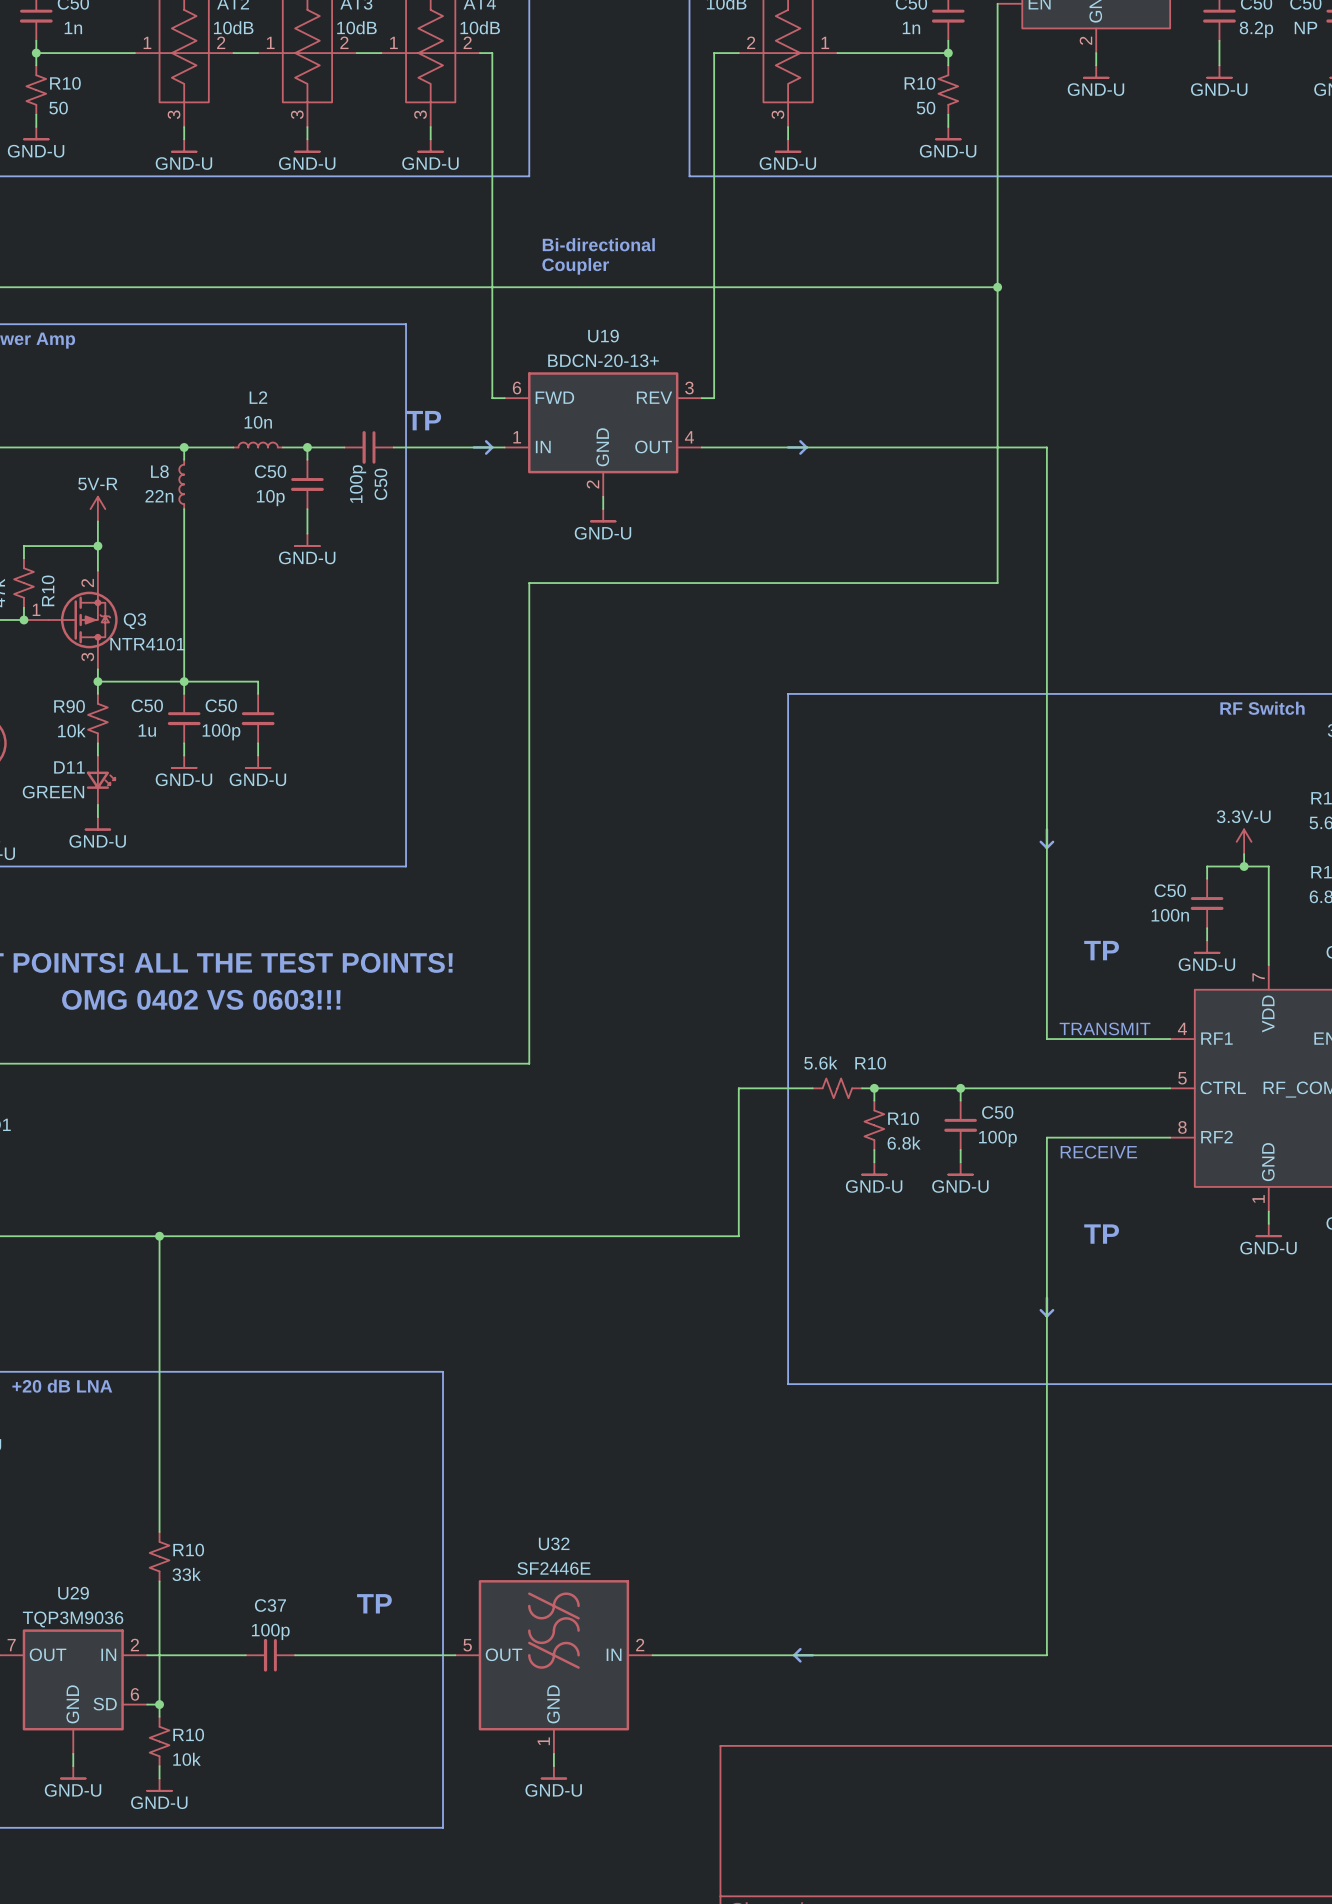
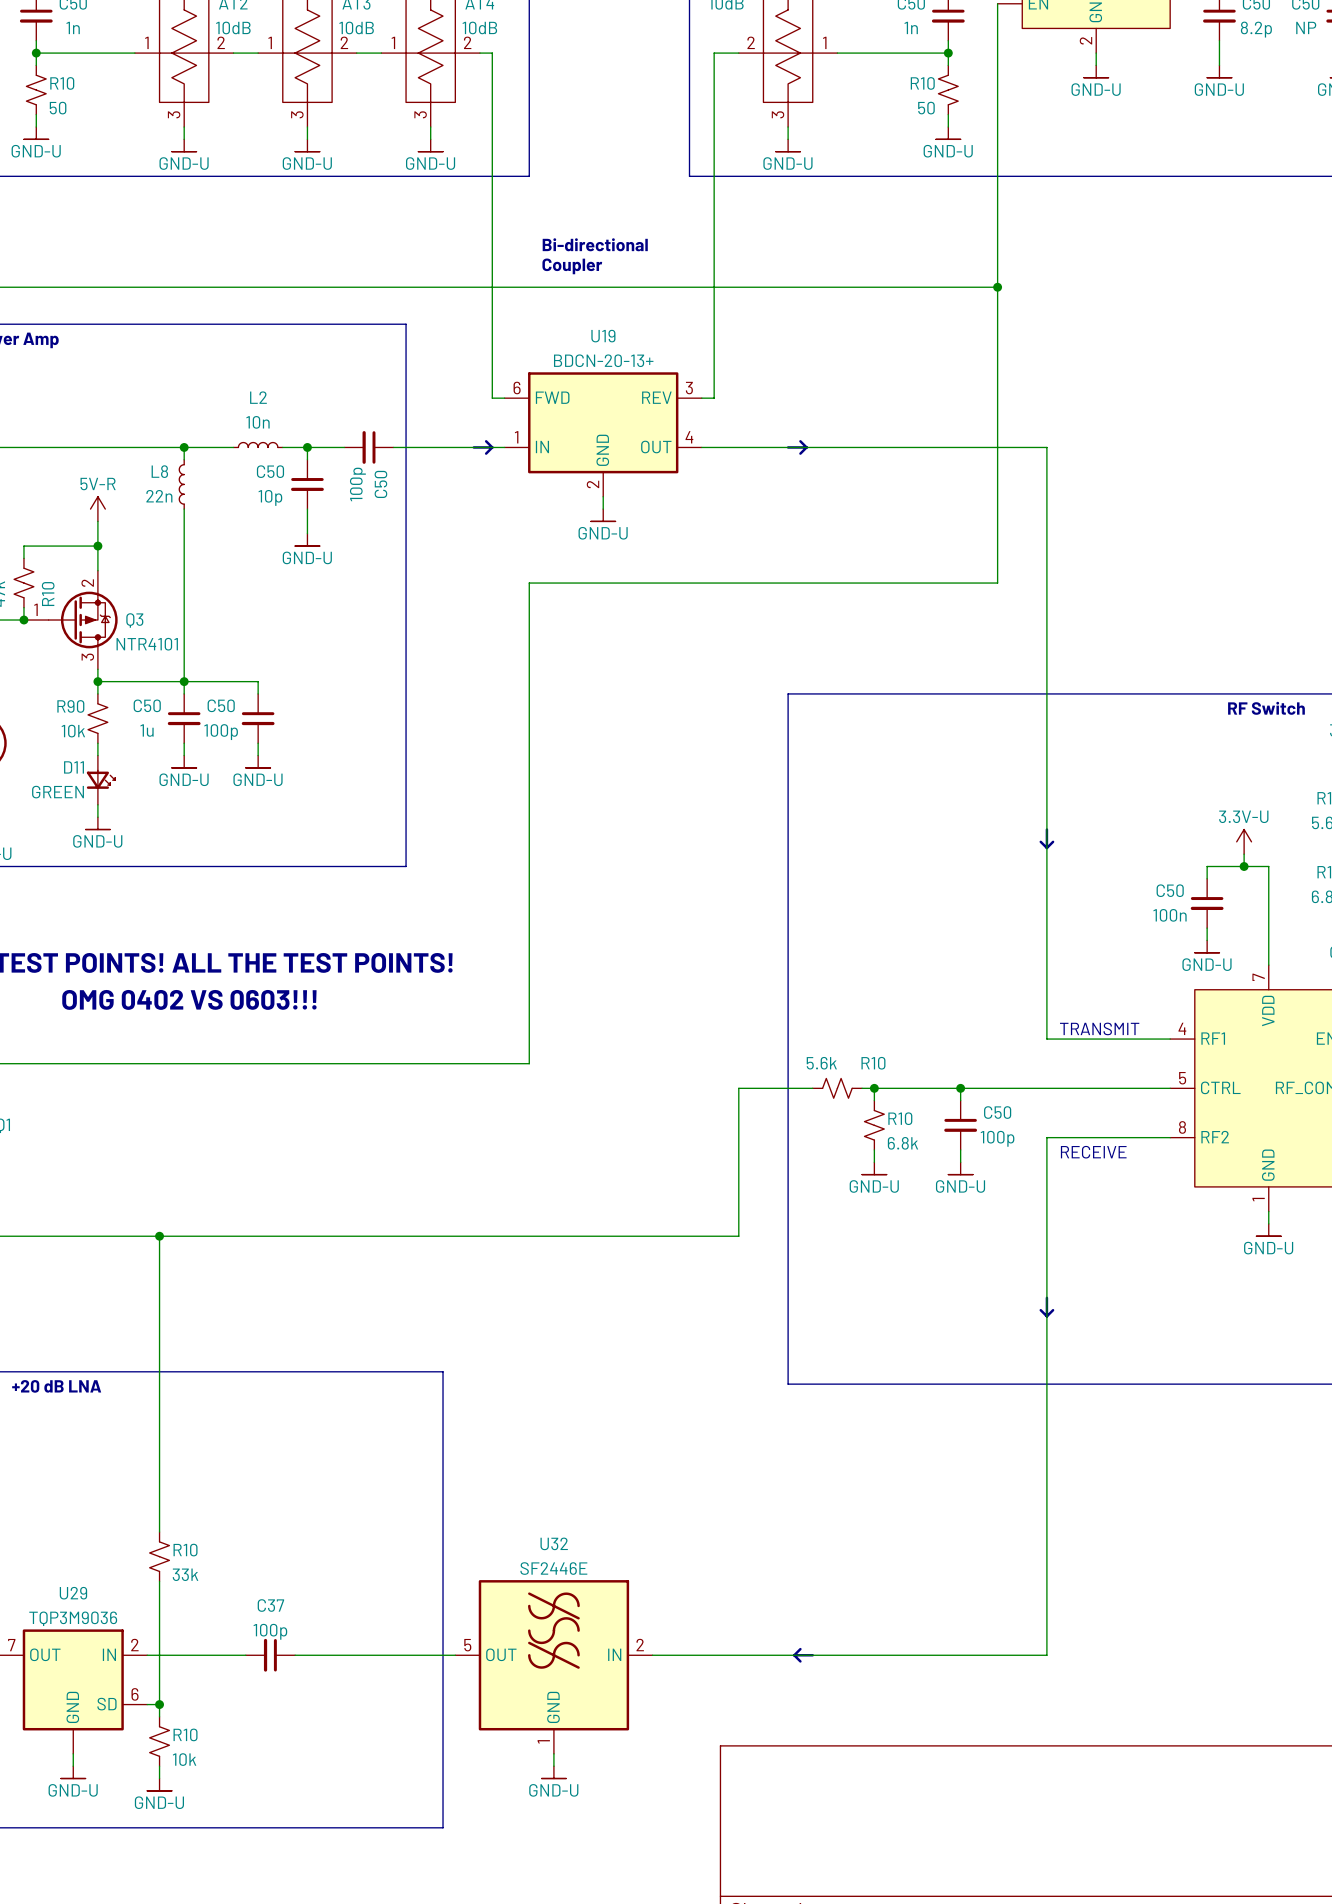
text: TP (423, 420) -> none
text: TP (1101, 950) -> none
text: TP (1101, 1234) -> none
text: TP (374, 1603) -> none

